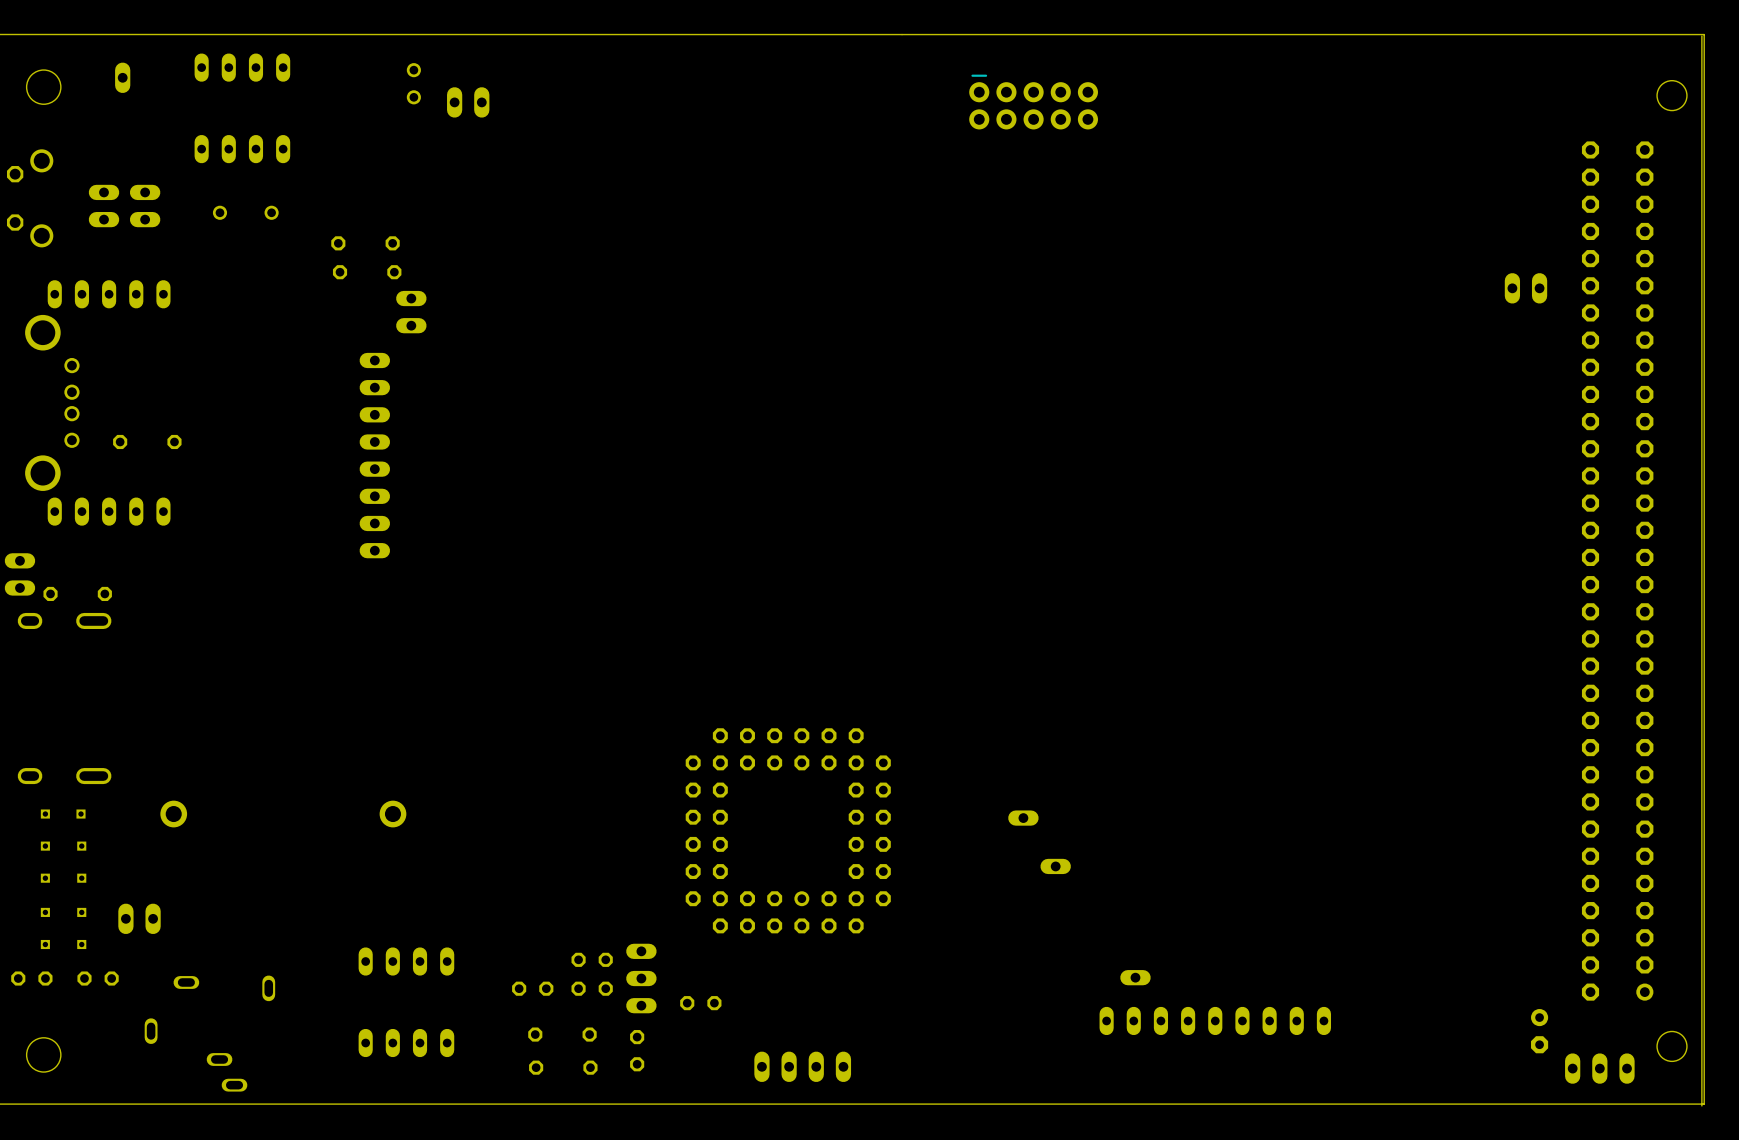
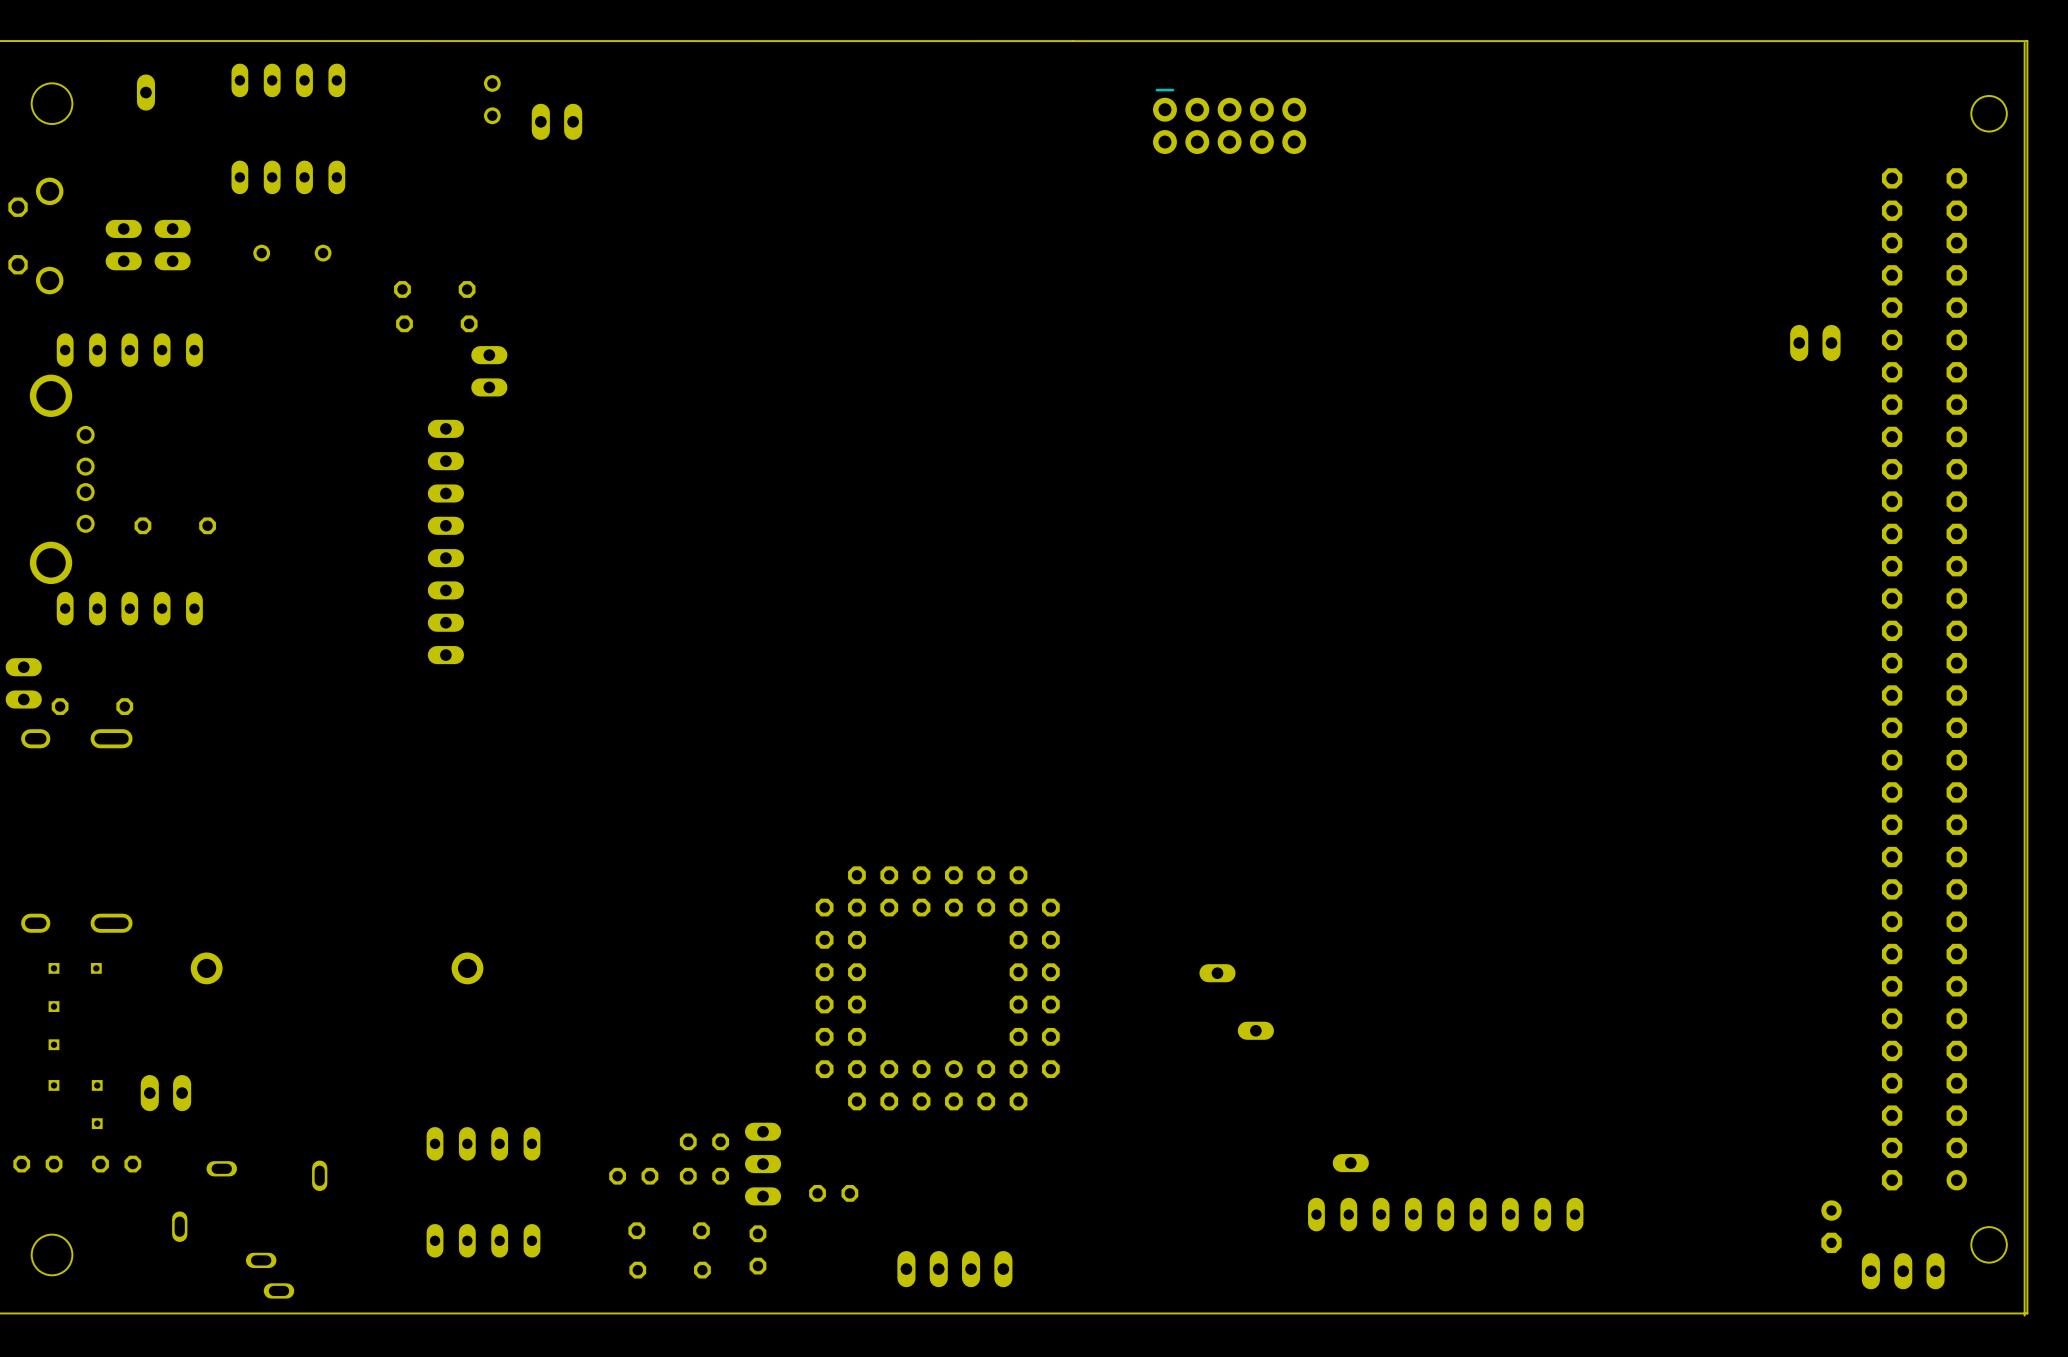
part: (81, 846) -> none
part: (81, 878) -> none
part: (45, 944) -> none

